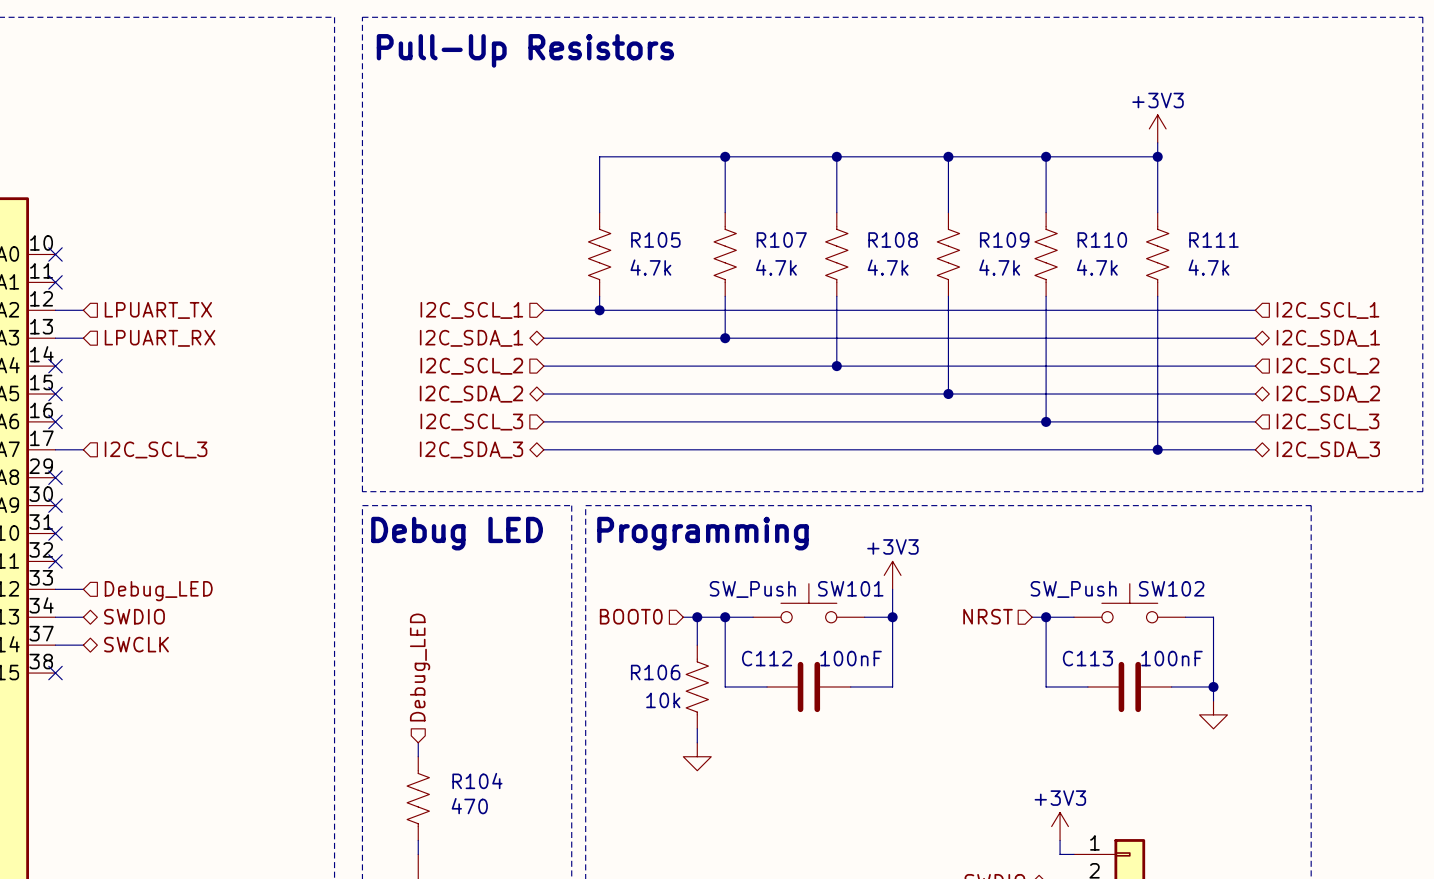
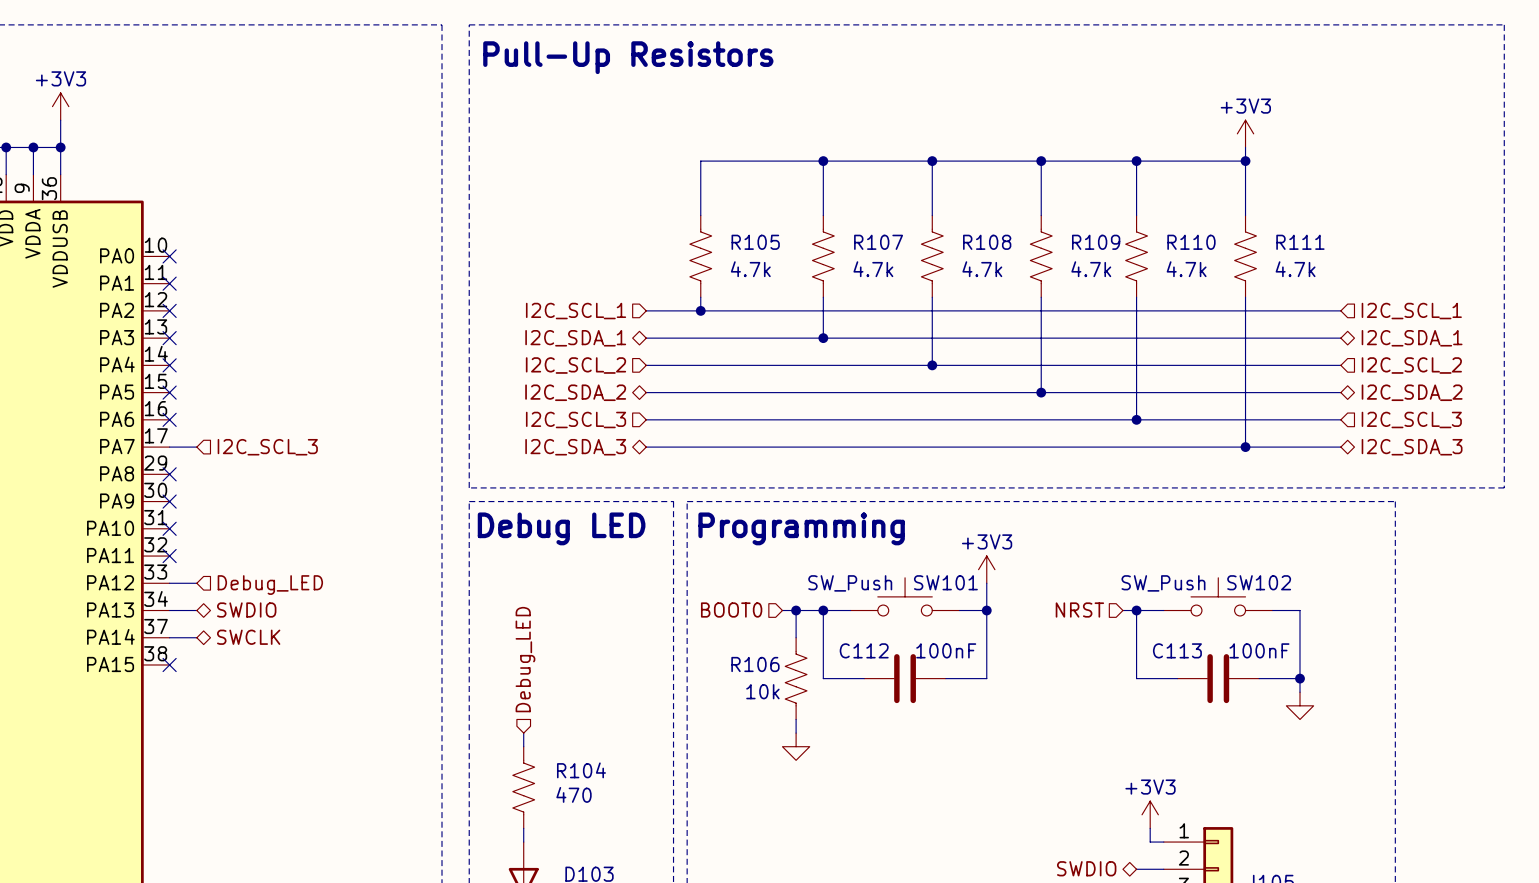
wire: (55, 310) (83, 310) -> none
no-connect mark: none -> (169, 310)
hierarchical label: LPUART_TX (158, 310) -> none
wire: (55, 338) (83, 338) -> none
no-connect mark: none -> (169, 338)
hierarchical label: LPUART_RX (160, 338) -> none

